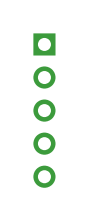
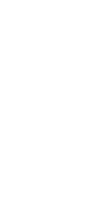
part: (44, 110) -> none

